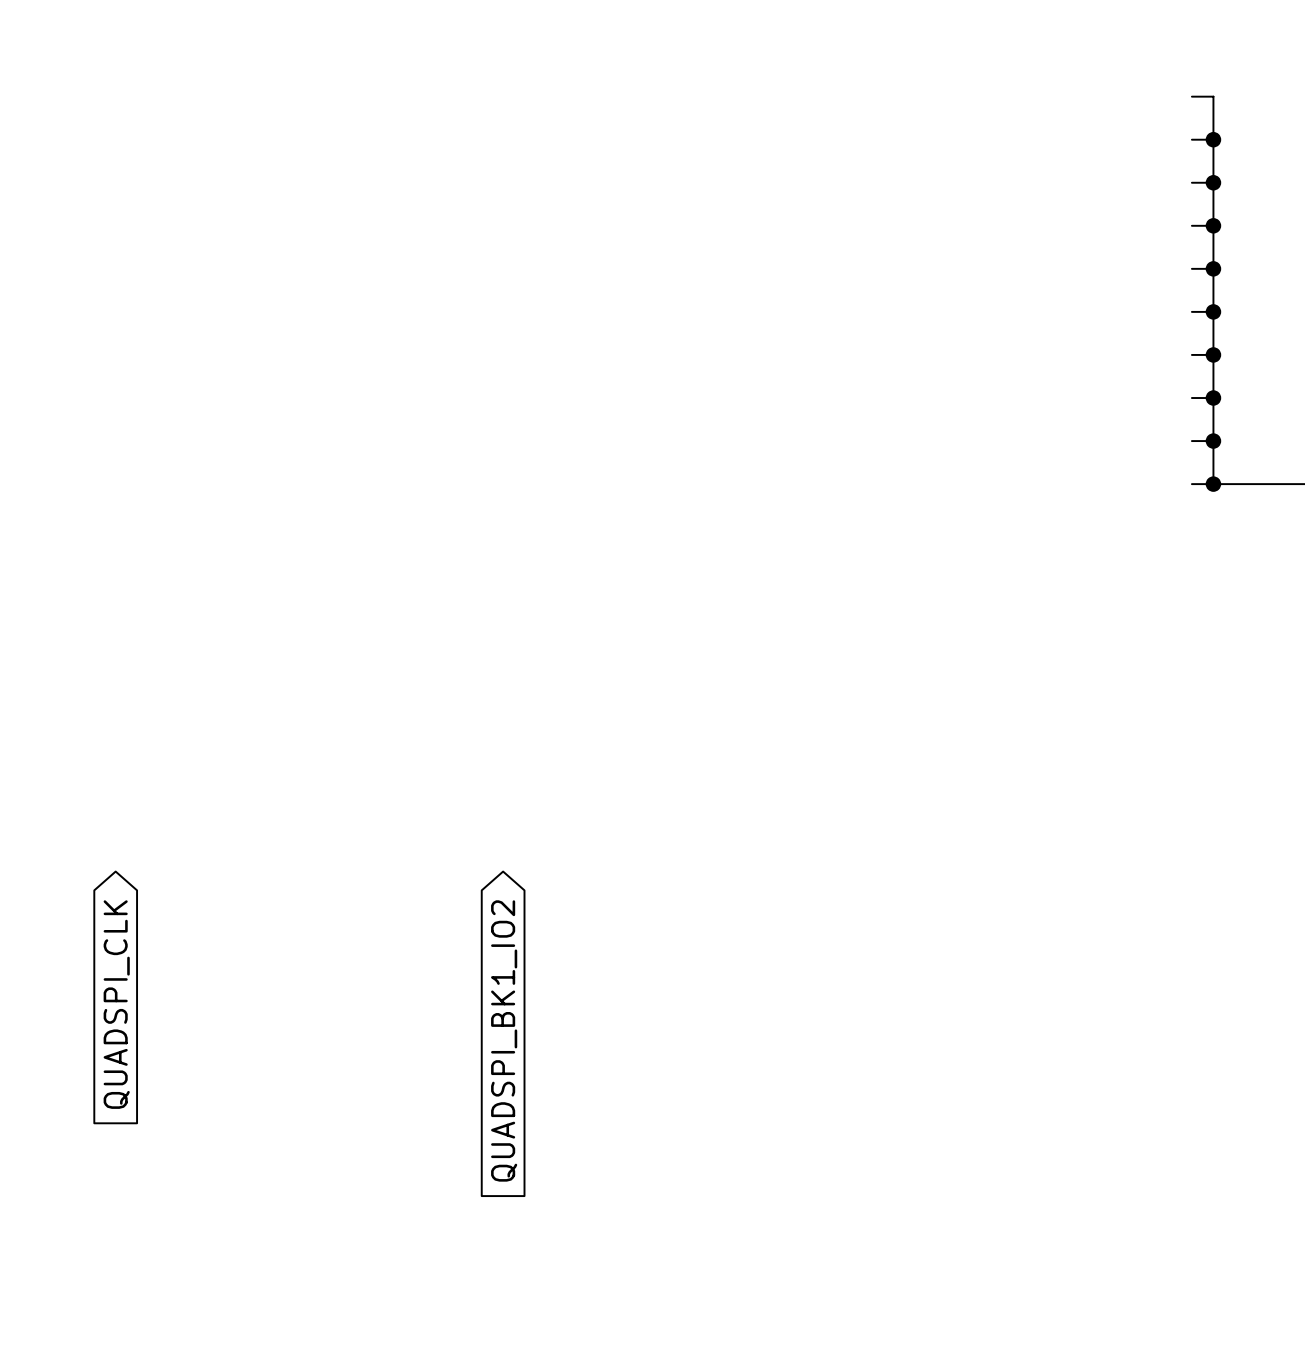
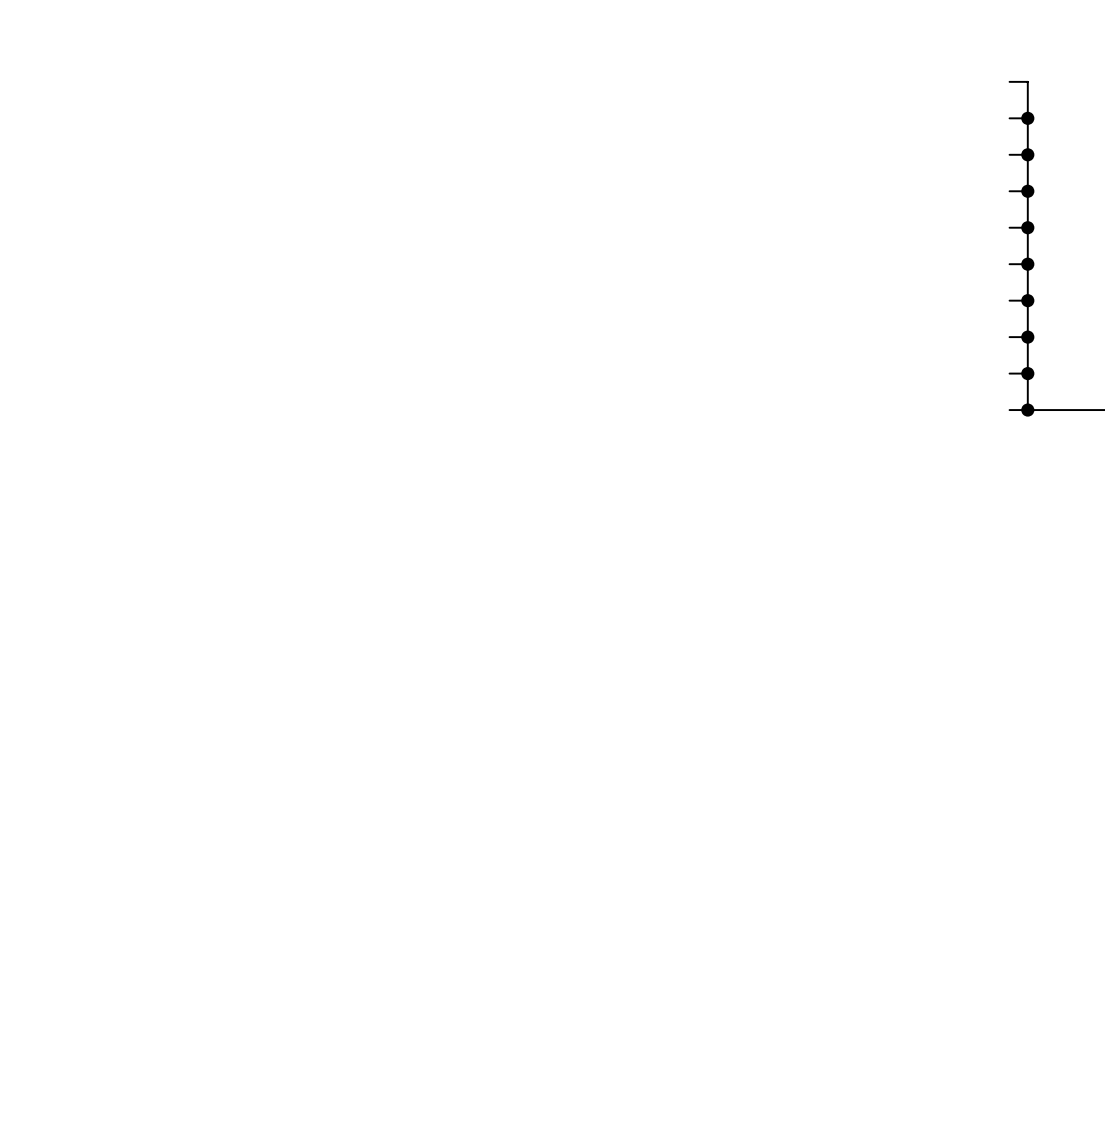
global label: QUADSPI_CLK (116, 1004) -> none
global label: QUADSPI_BK1_IO2 (504, 1040) -> none

